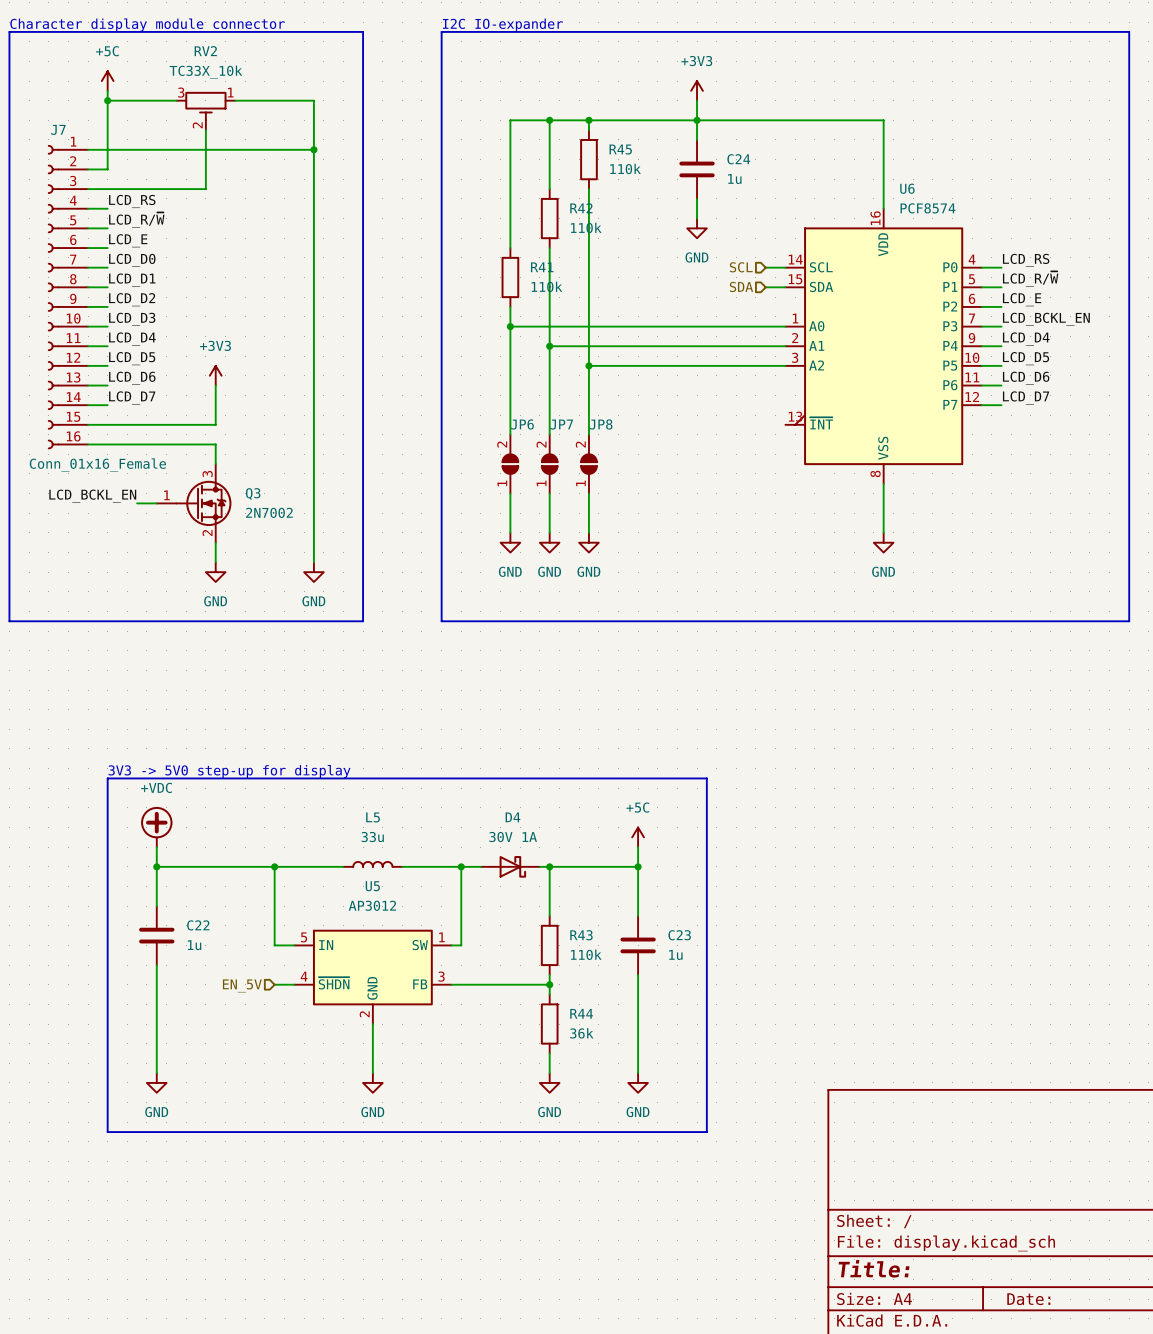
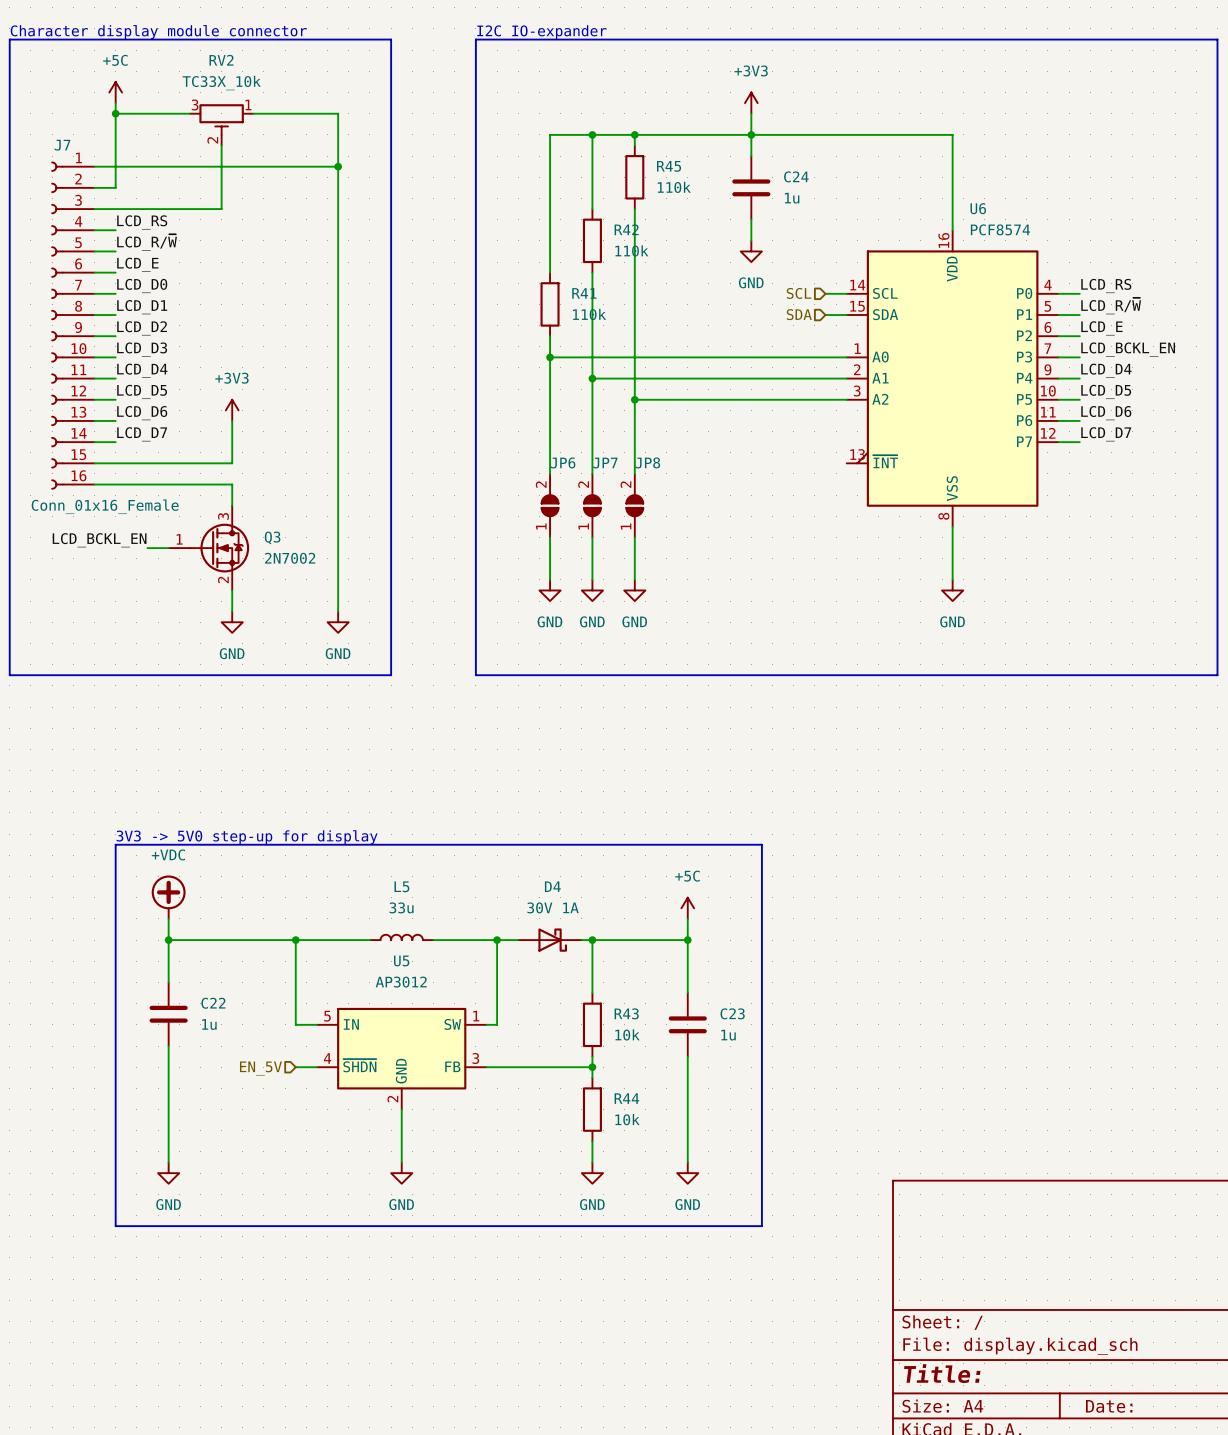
R43 value: 110k (586, 954) -> 10k (627, 1034)
R44 value: 36k (581, 1033) -> 10k (627, 1119)

